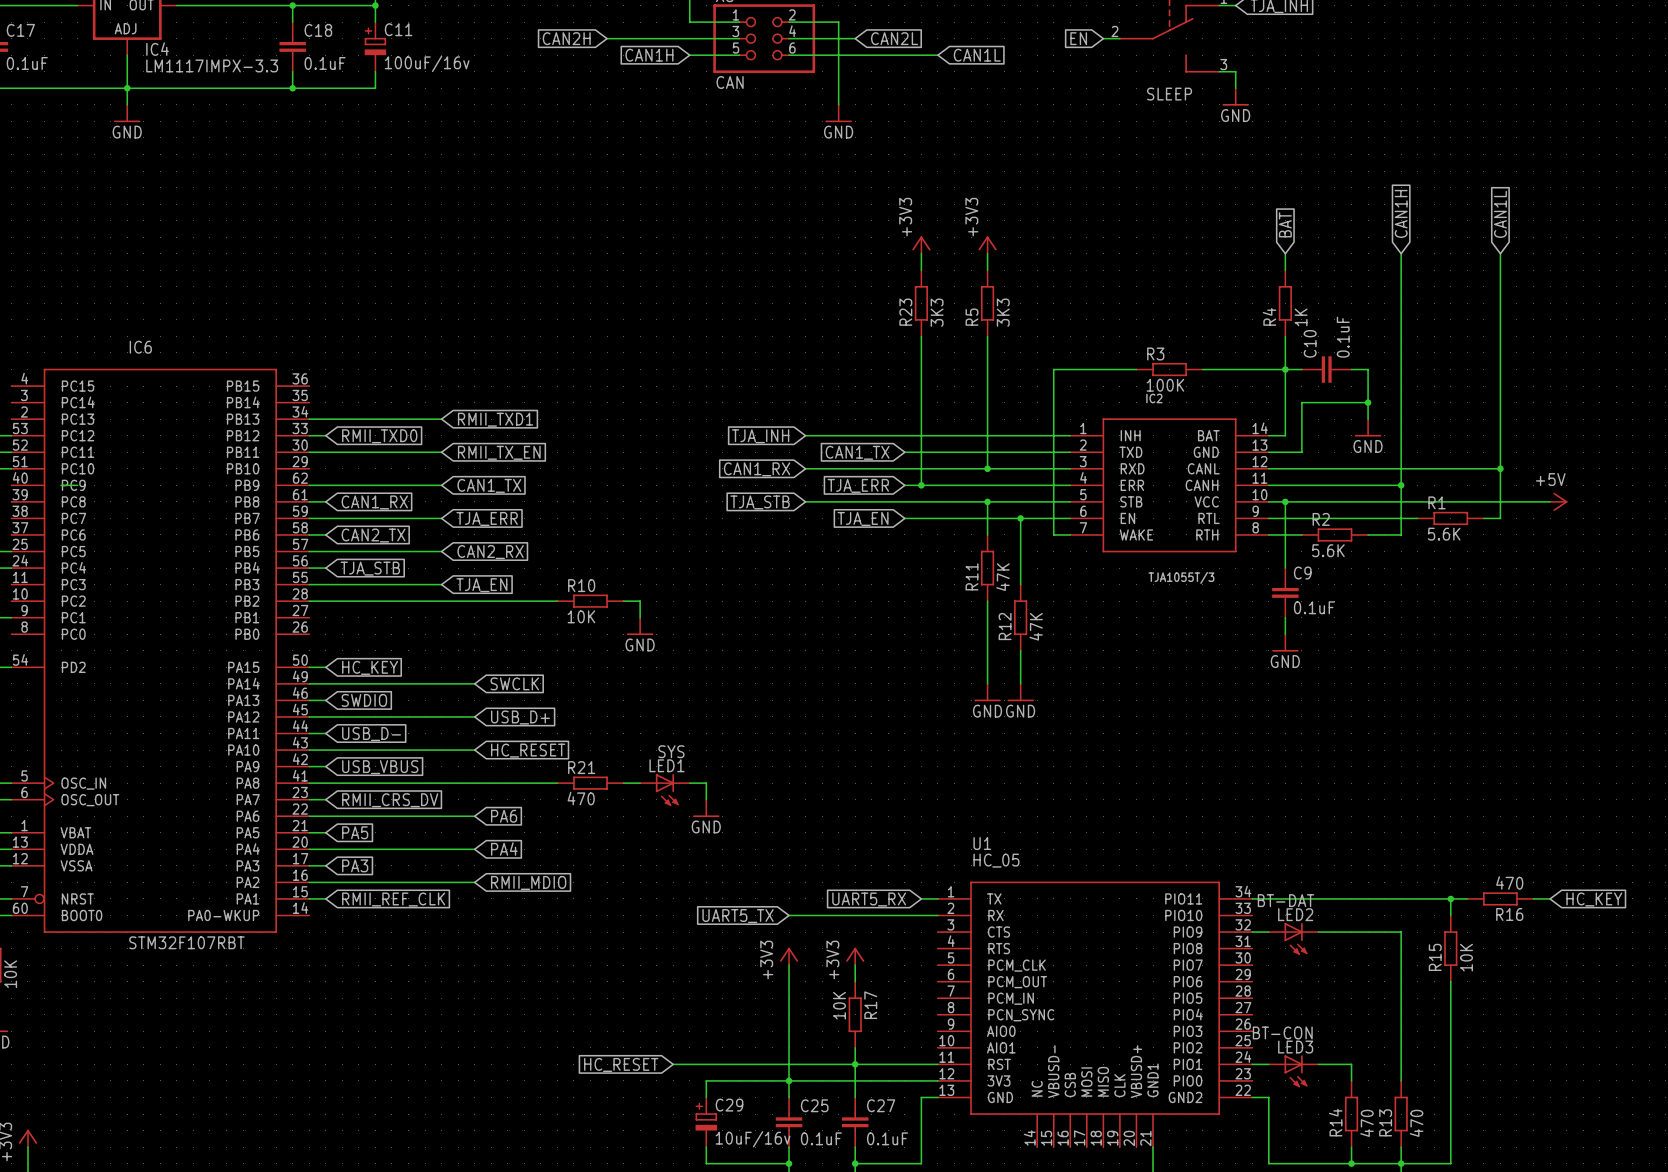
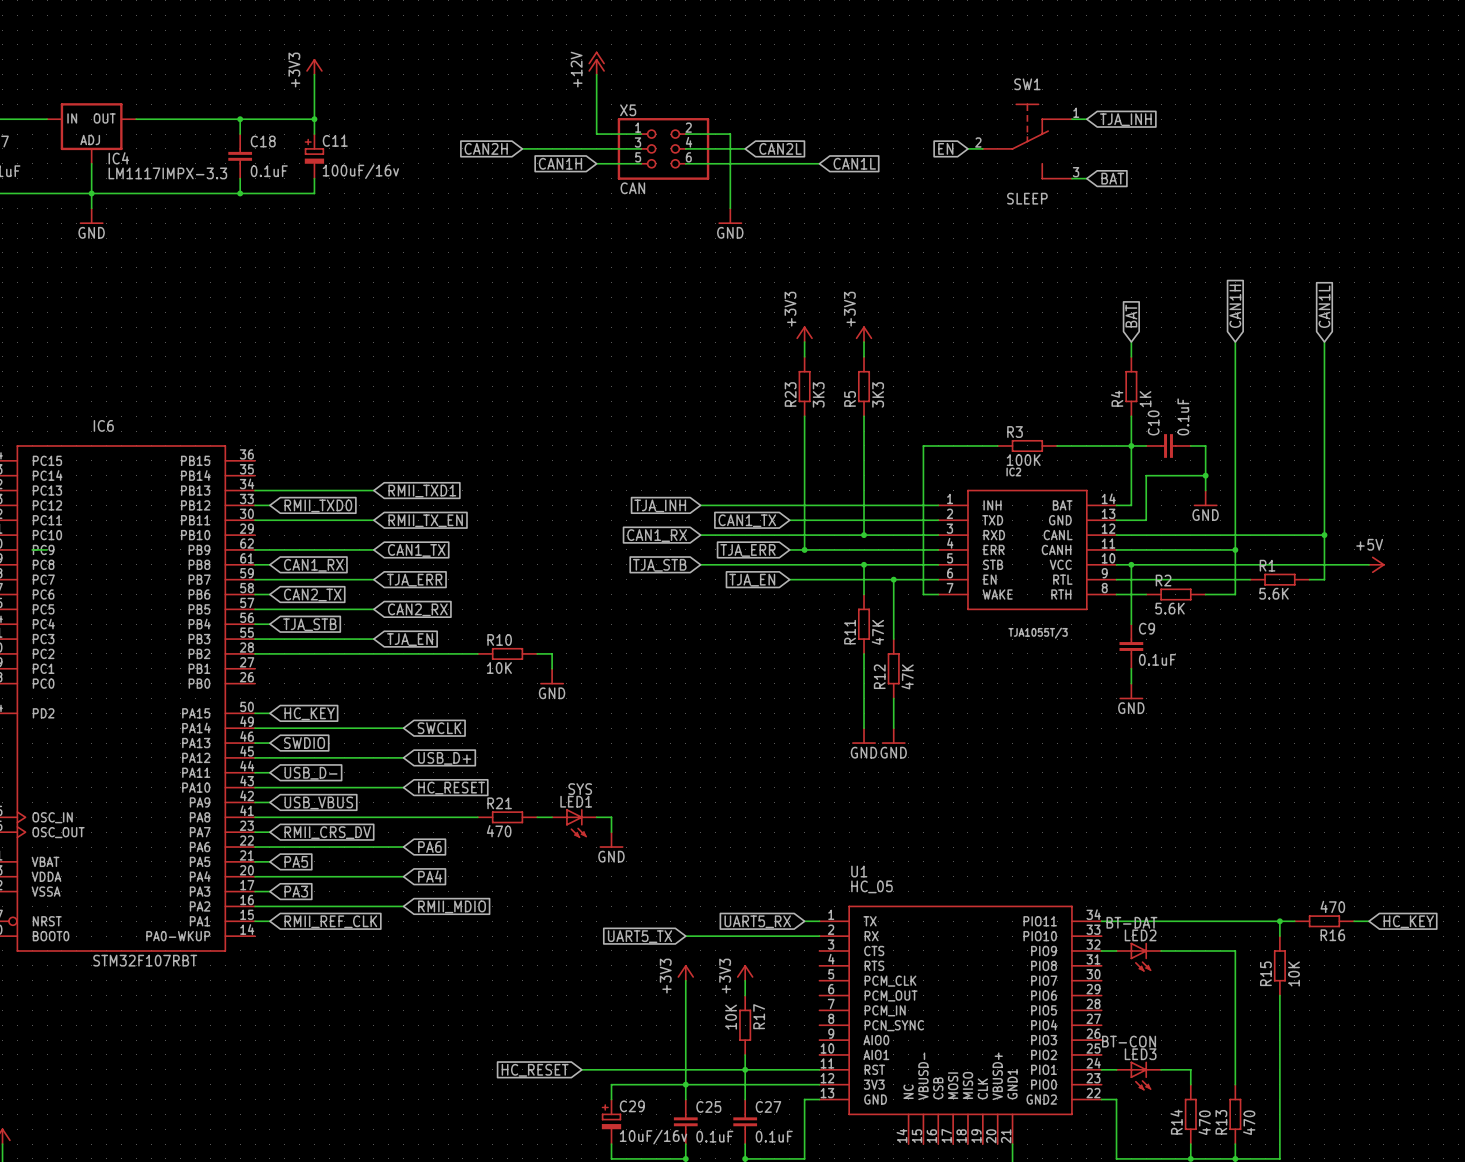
wire: (1235, 71) (1235, 88) -> none
global label: none -> BAT (1112, 178)
power symbol: GND (1235, 96) -> none

